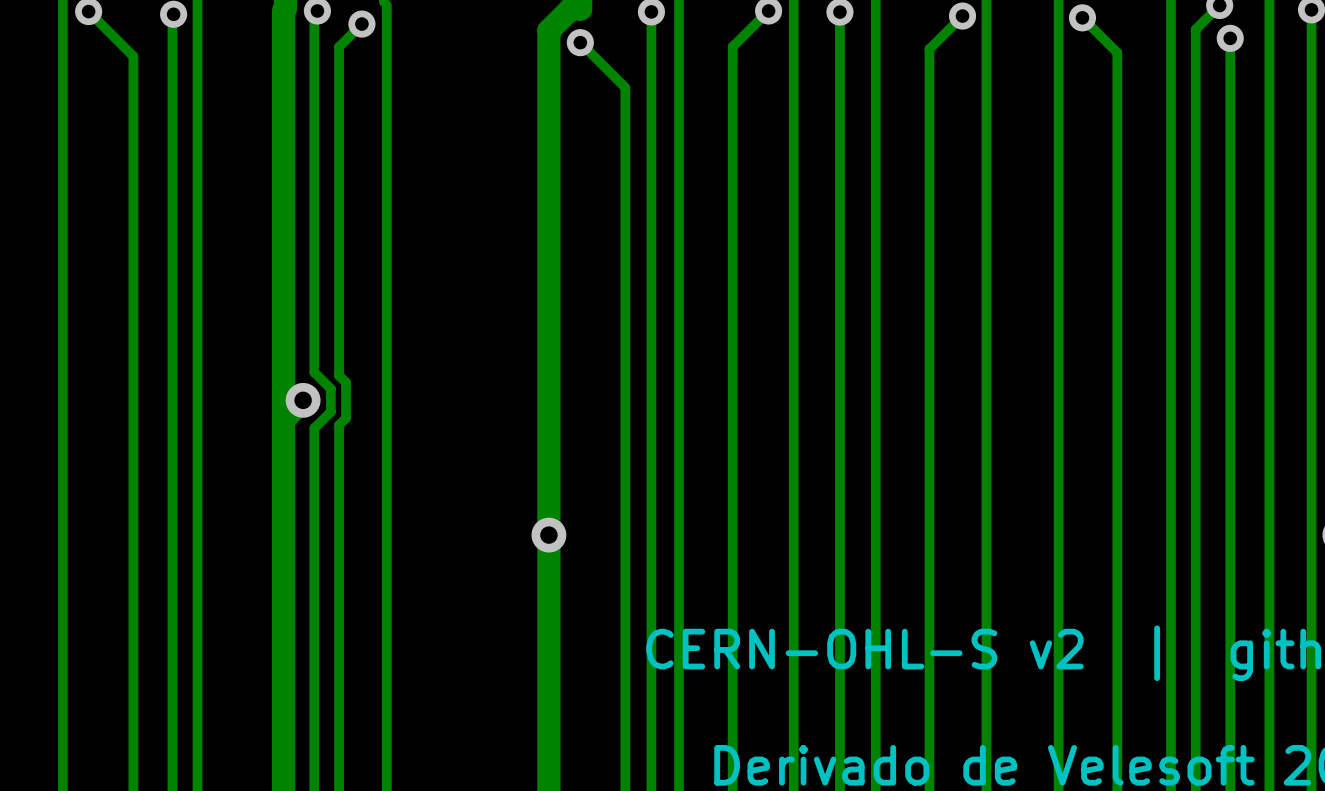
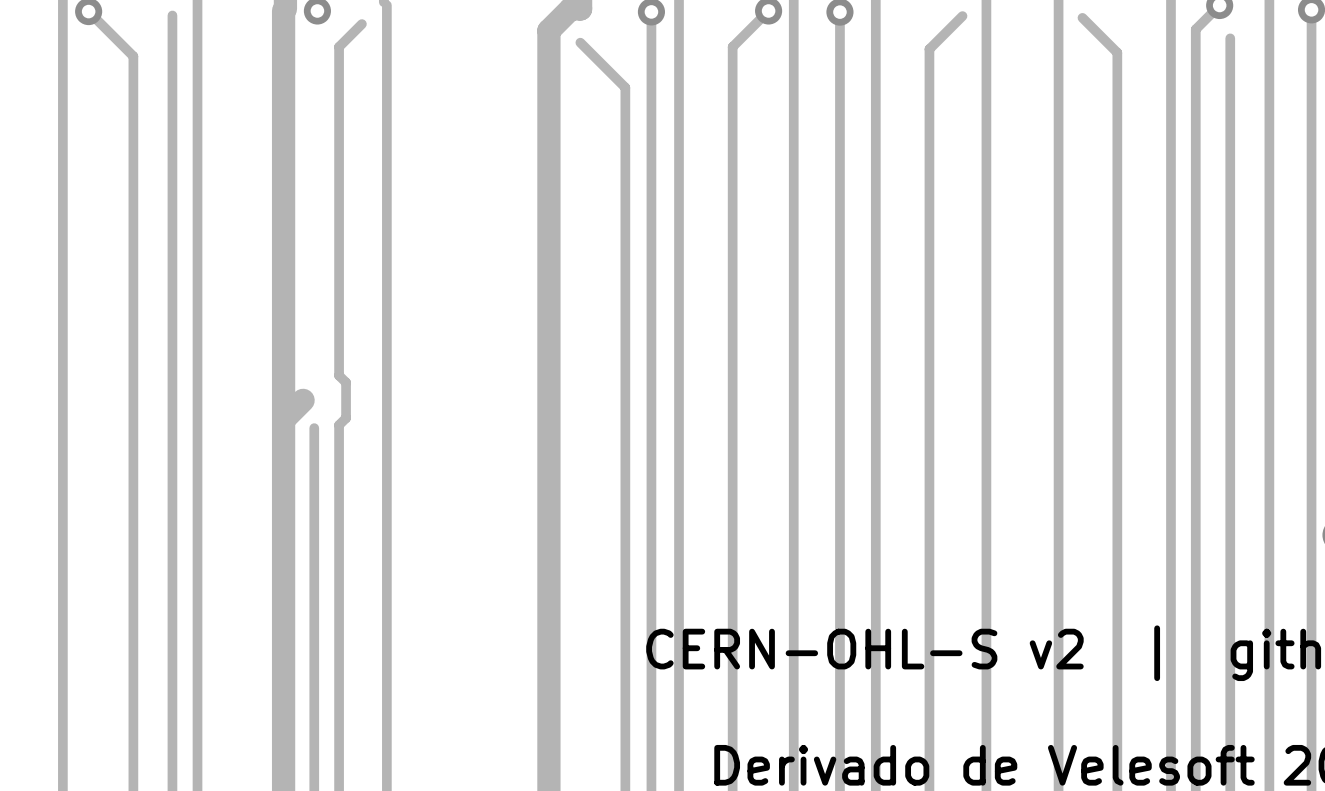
via: (173, 14) -> none
track: (314, 14) (314, 372) -> none
via: (962, 16) -> none
via: (1082, 17) -> none
via: (361, 24) -> none
via: (1230, 38) -> none
via: (580, 42) -> none
track: (314, 372) (330, 388) (330, 411) (314, 428) -> none
via: (303, 400) -> none
via: (548, 535) -> none

